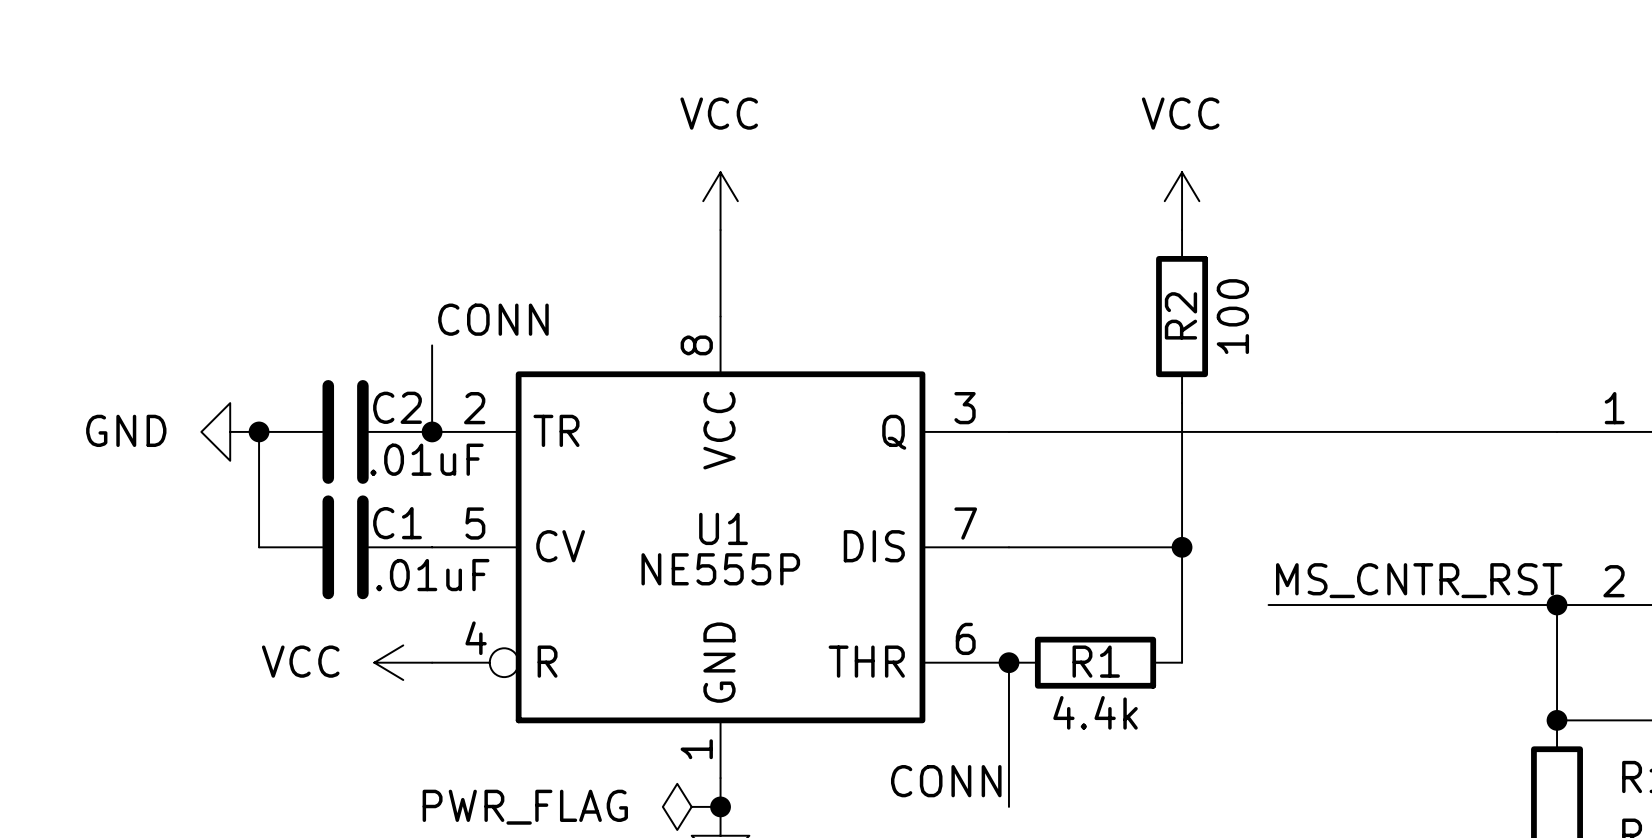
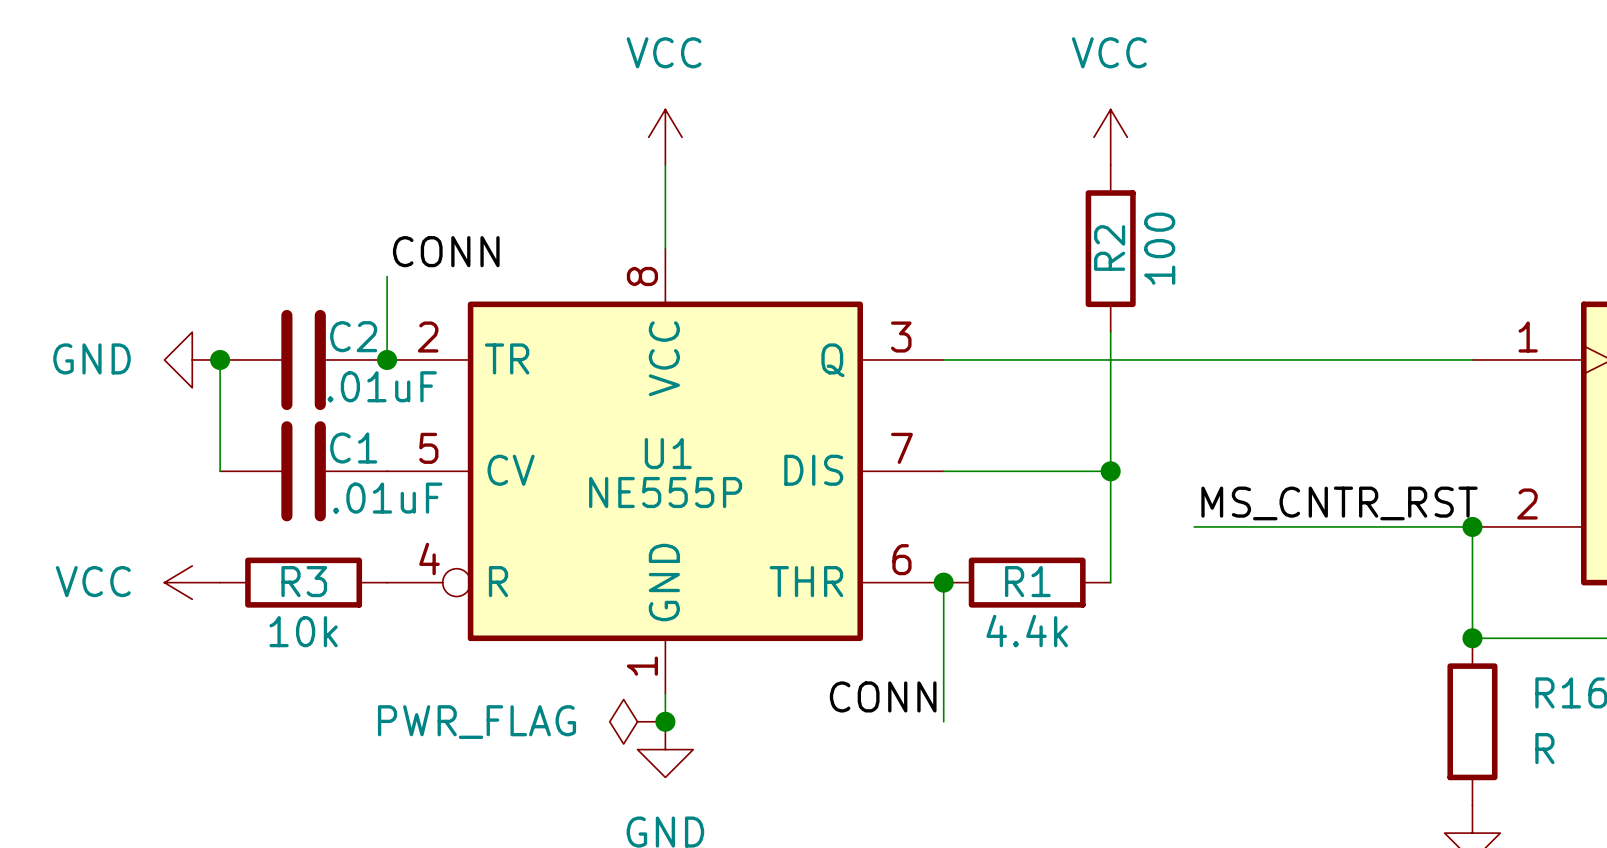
R3: none -> 10k (303, 582)
power symbol position: VCC (403, 662) -> VCC (192, 582)

